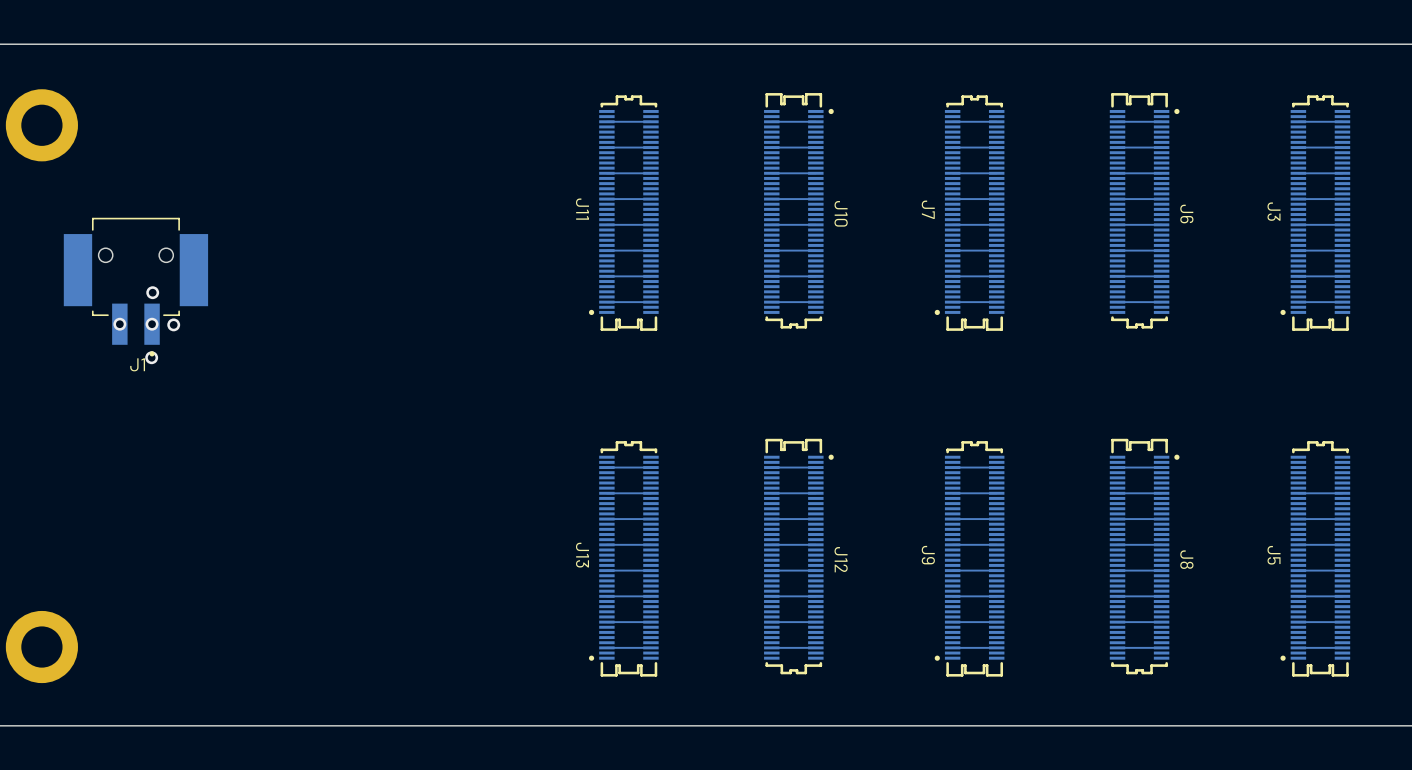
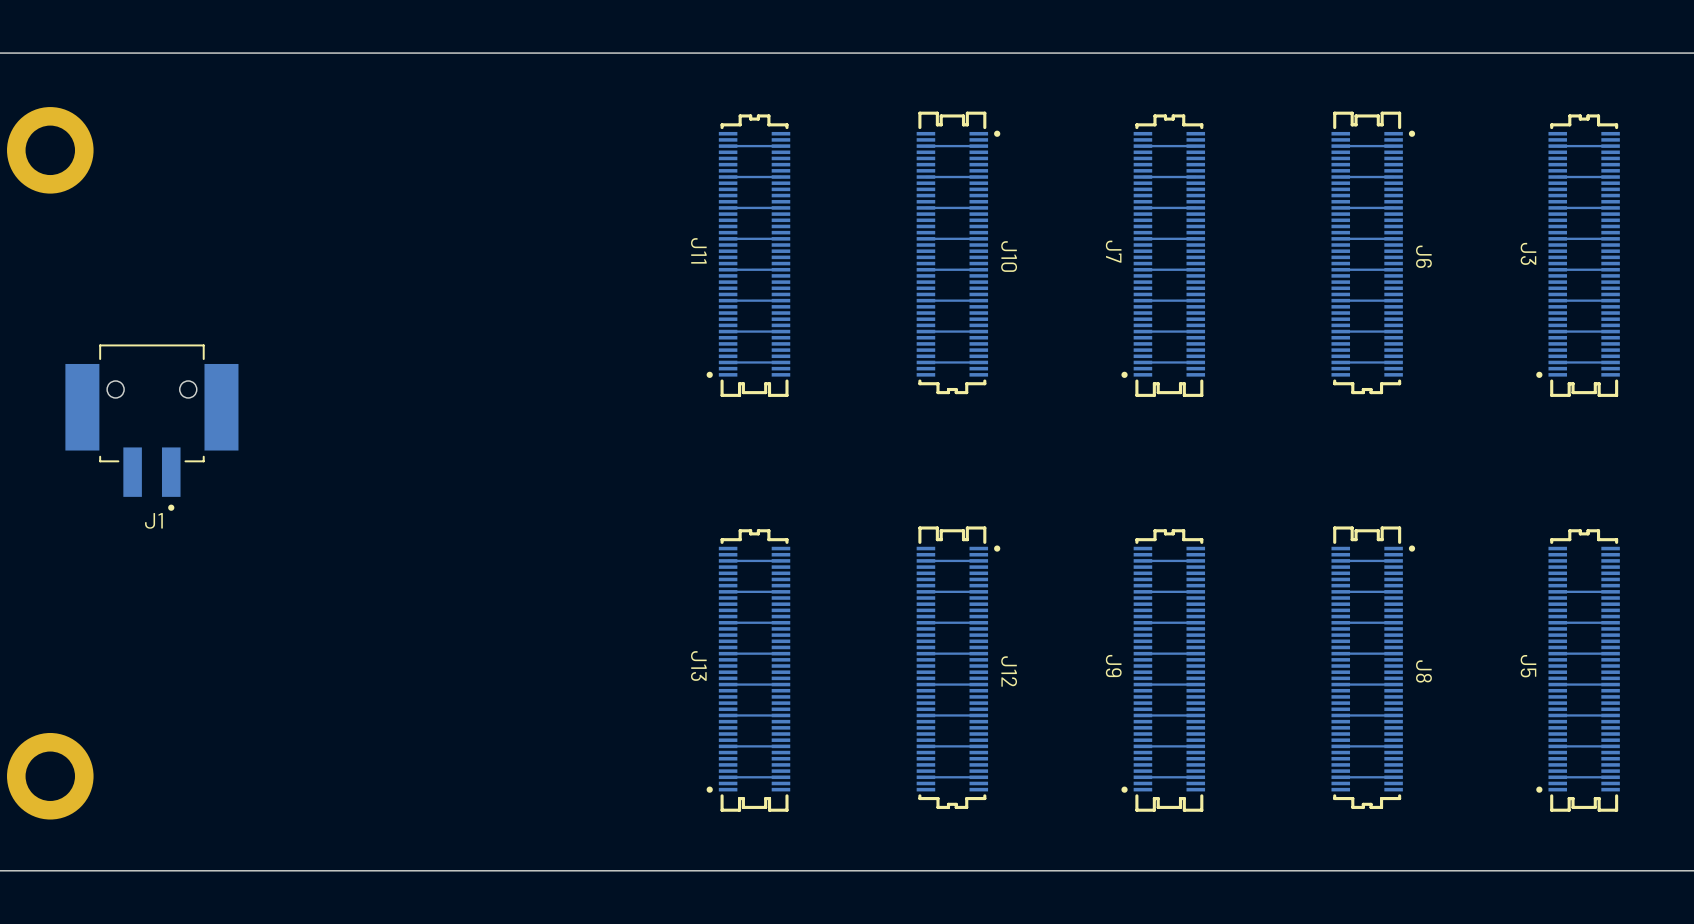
J1 position: (135, 287) -> (151, 427)
via: (152, 292) -> none
via: (119, 324) -> none
via: (152, 324) -> none
via: (173, 324) -> none
via: (151, 357) -> none

